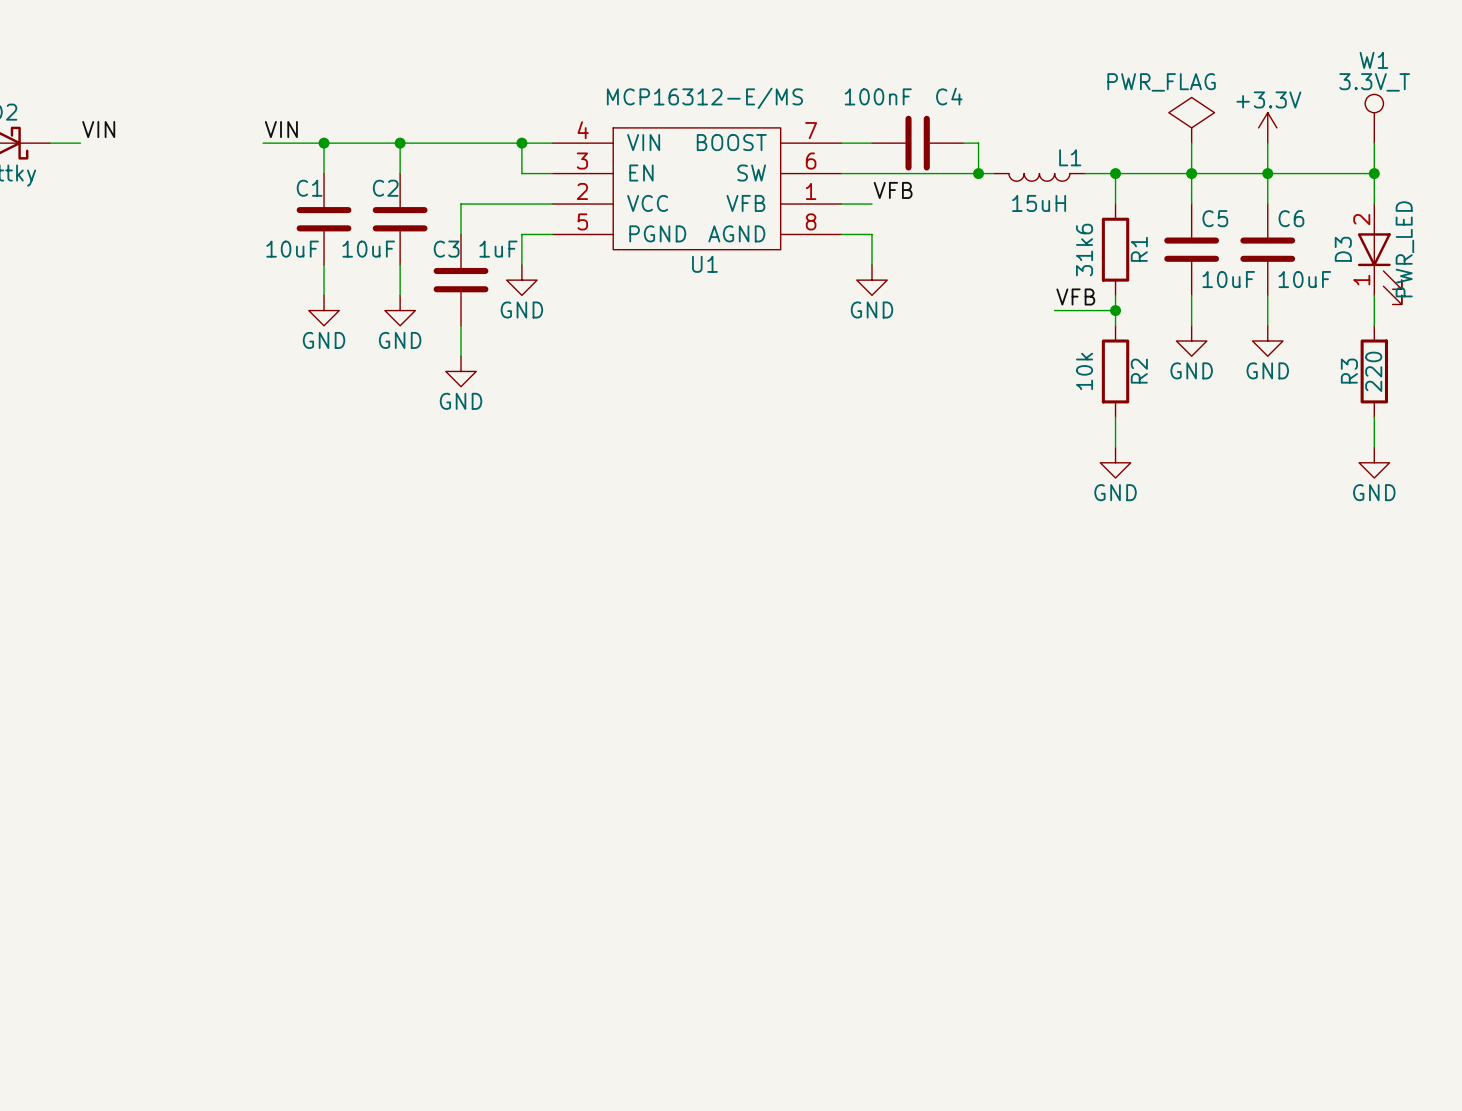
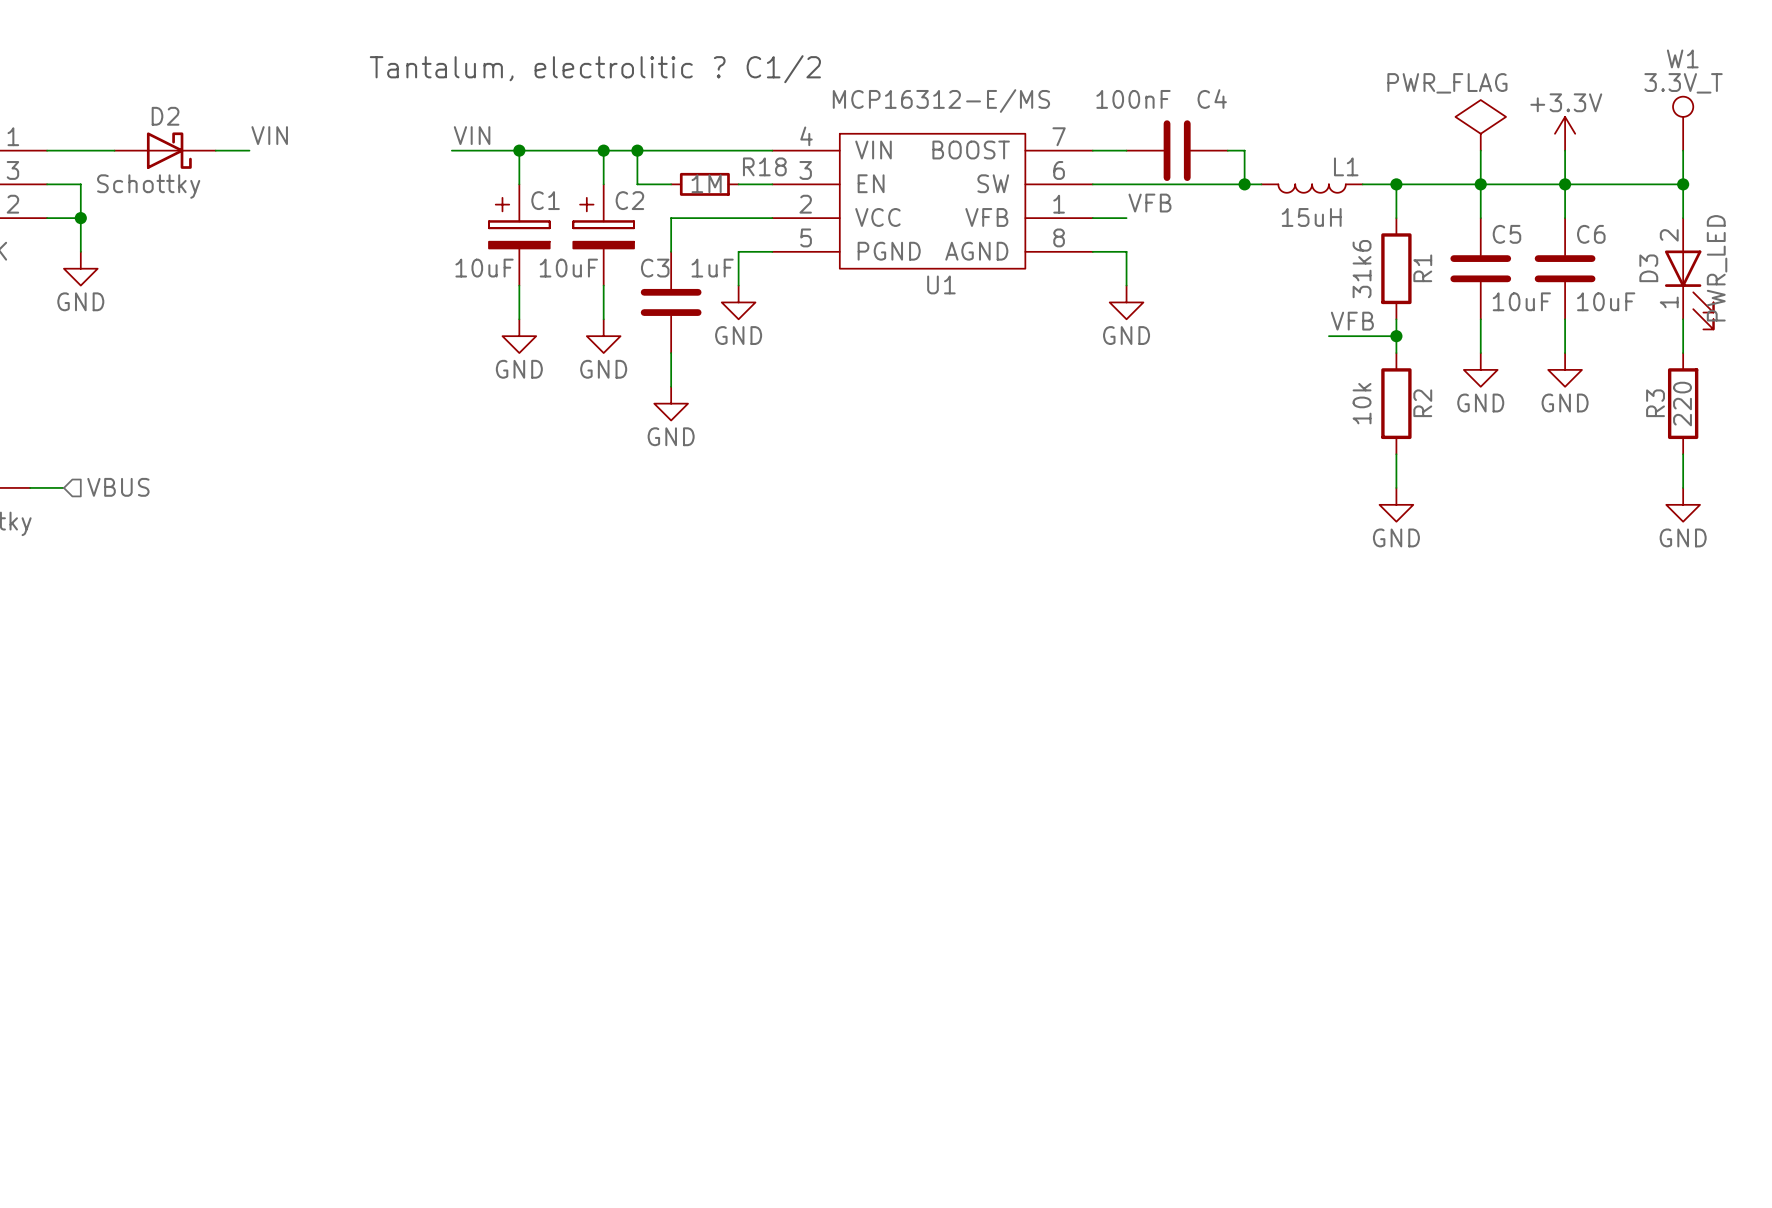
text: none -> Tantalum, electrolitic ? C1/2 (595, 69)
wire: none -> (637, 150) (637, 184) (671, 184)
junction: none -> (637, 150)
wire: (521, 143) (521, 173) -> none
junction: (521, 143) -> none
C1 symbol: [296, 173, 352, 265] -> [488, 184, 550, 286]
C2 symbol: [372, 173, 428, 265] -> [573, 184, 635, 286]
R18: none -> 1M (704, 184)
C1 name position: C1 (309, 188) -> C1 (545, 200)
C2 name position: C2 (385, 188) -> C2 (629, 200)

